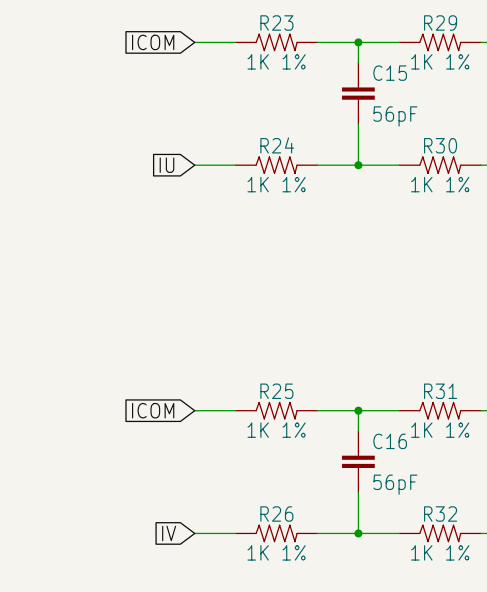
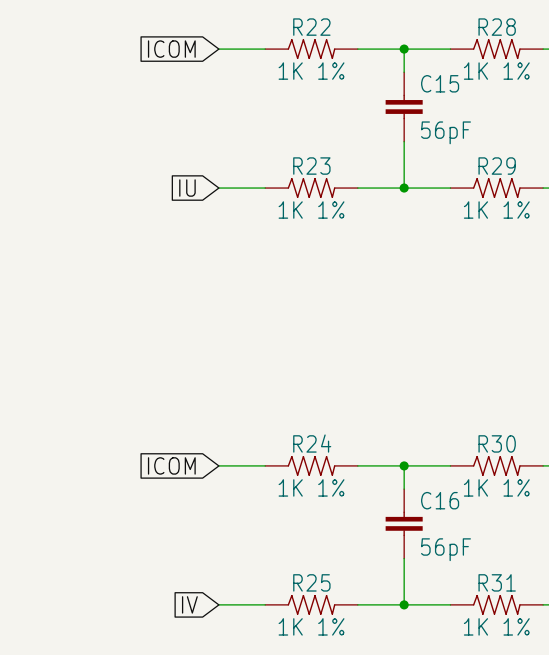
R23 name: R23 (276, 22) -> R22 (311, 27)
R29 name: R29 (440, 22) -> R28 (497, 27)
R24 name: R24 (277, 145) -> R23 (311, 166)
R30 name: R30 (440, 145) -> R29 (497, 166)
R25 name: R25 (276, 391) -> R24 (312, 443)
R31 name: R31 (440, 391) -> R30 (497, 443)
R26 name: R26 (276, 514) -> R25 (311, 582)
R32 name: R32 (440, 514) -> R31 (497, 582)

